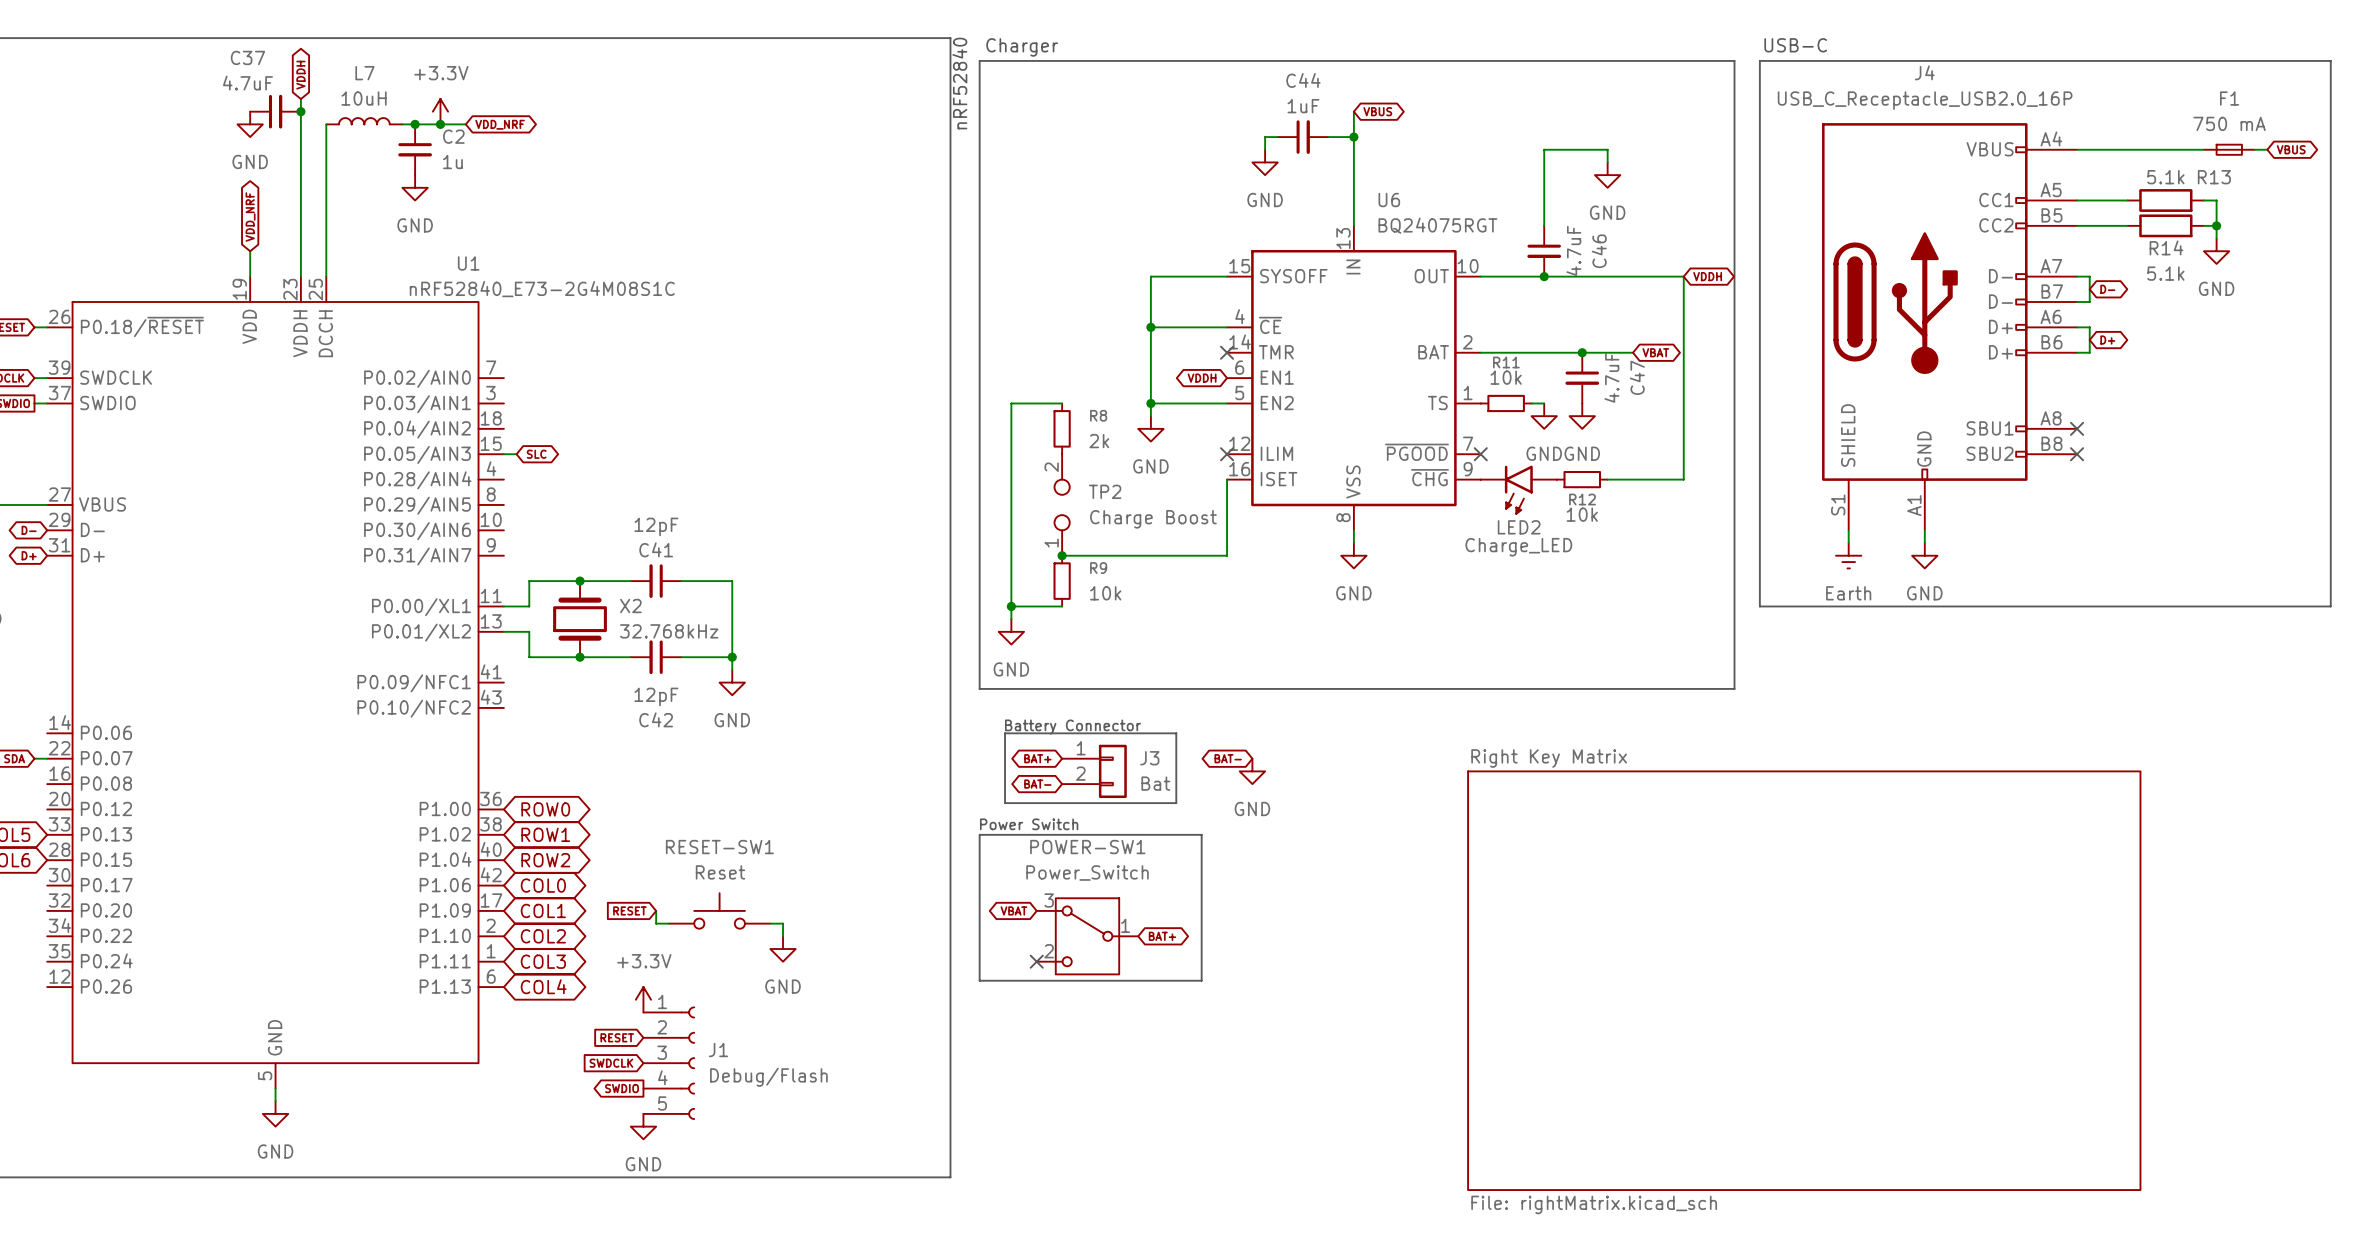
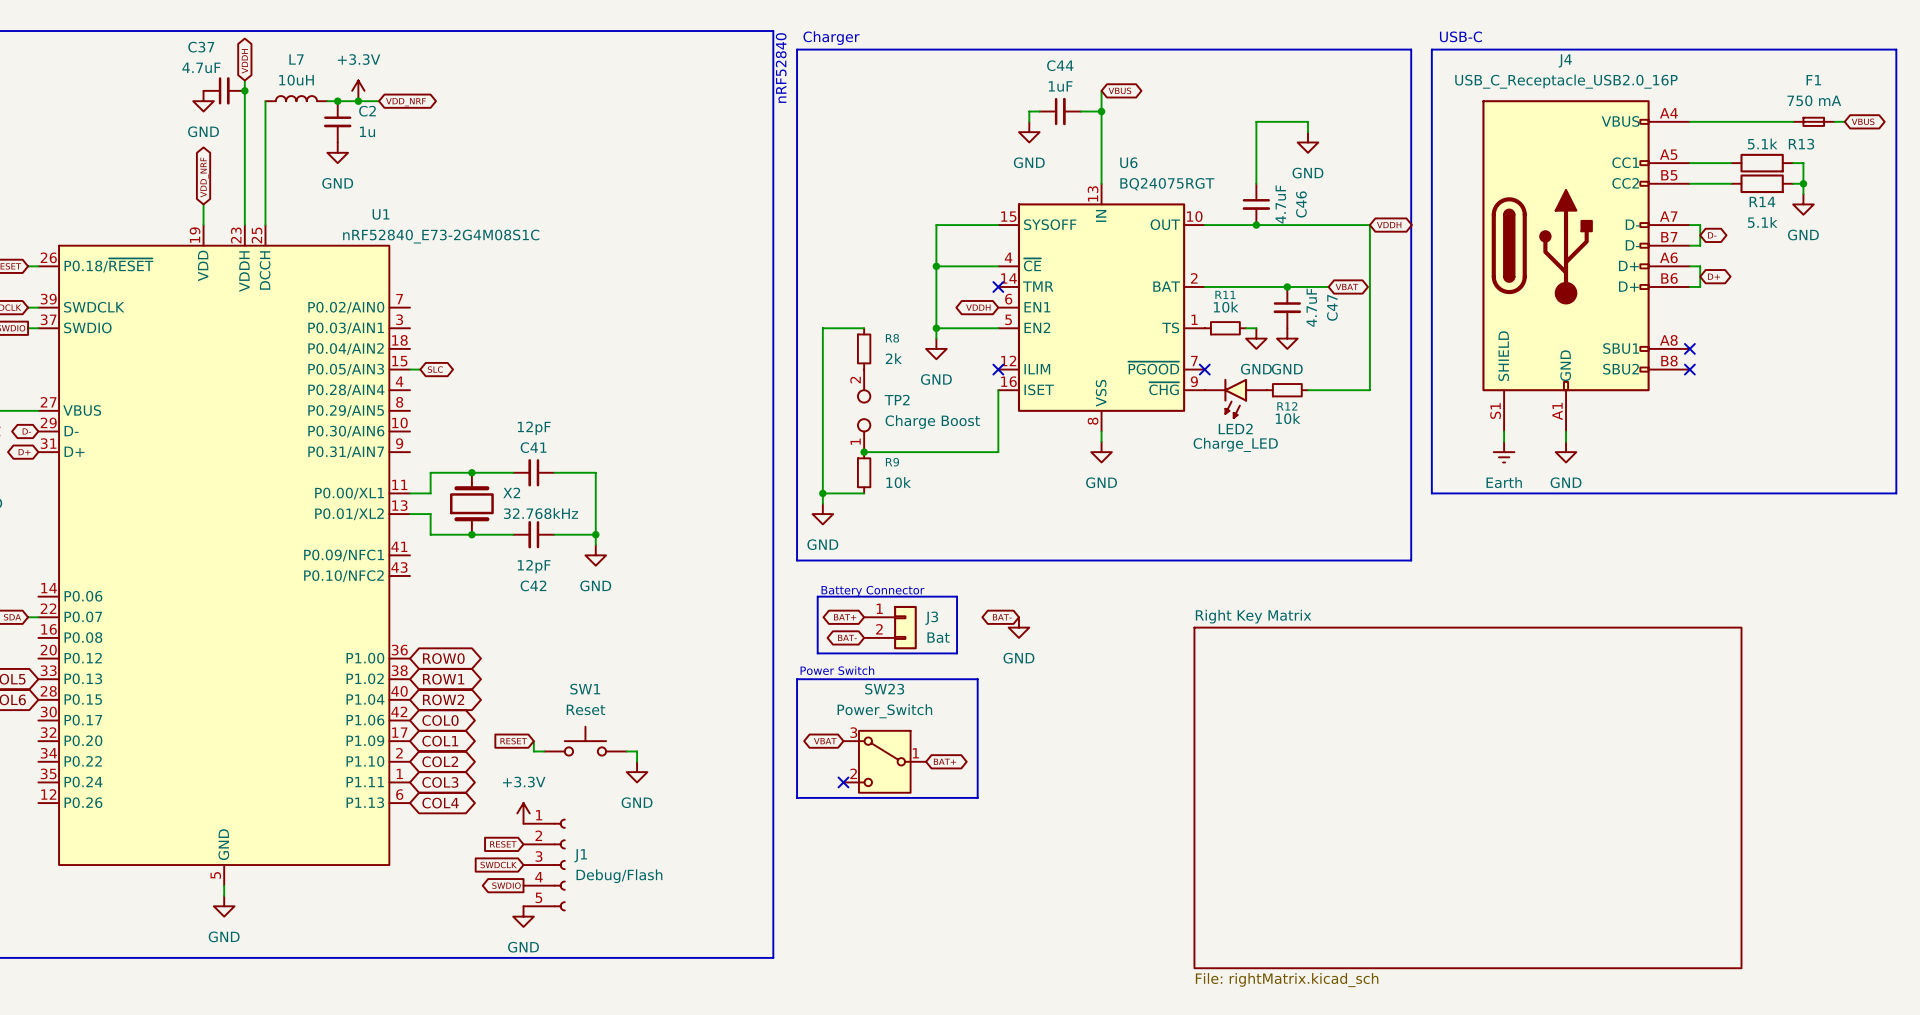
RESET-SW1 name: RESET-SW1 (719, 847) -> SW1 (585, 689)
POWER-SW1 name: POWER-SW1 (1087, 847) -> SW23 (884, 689)

